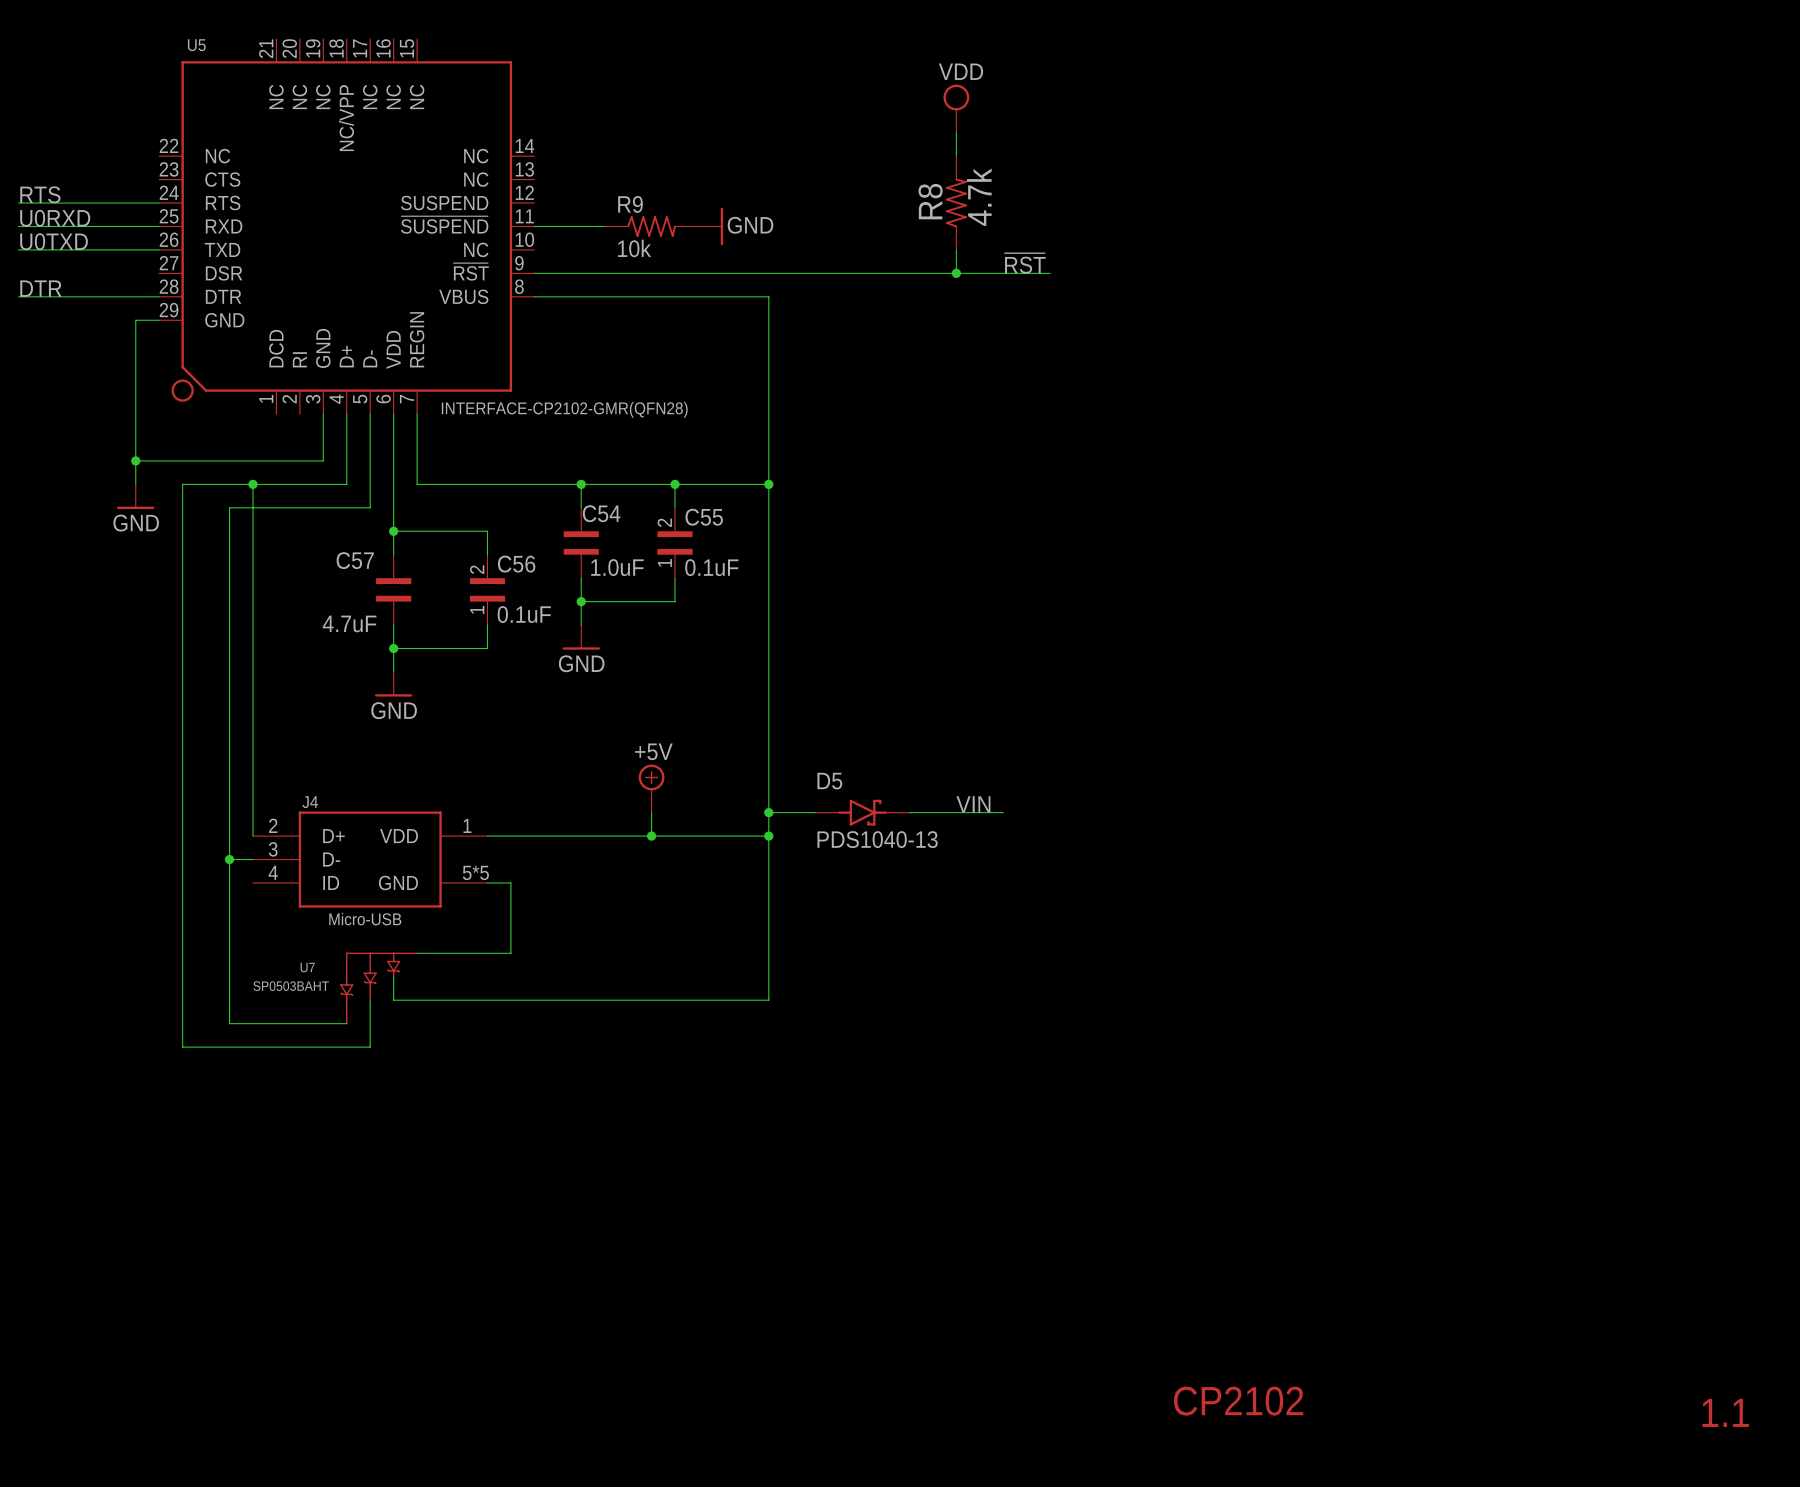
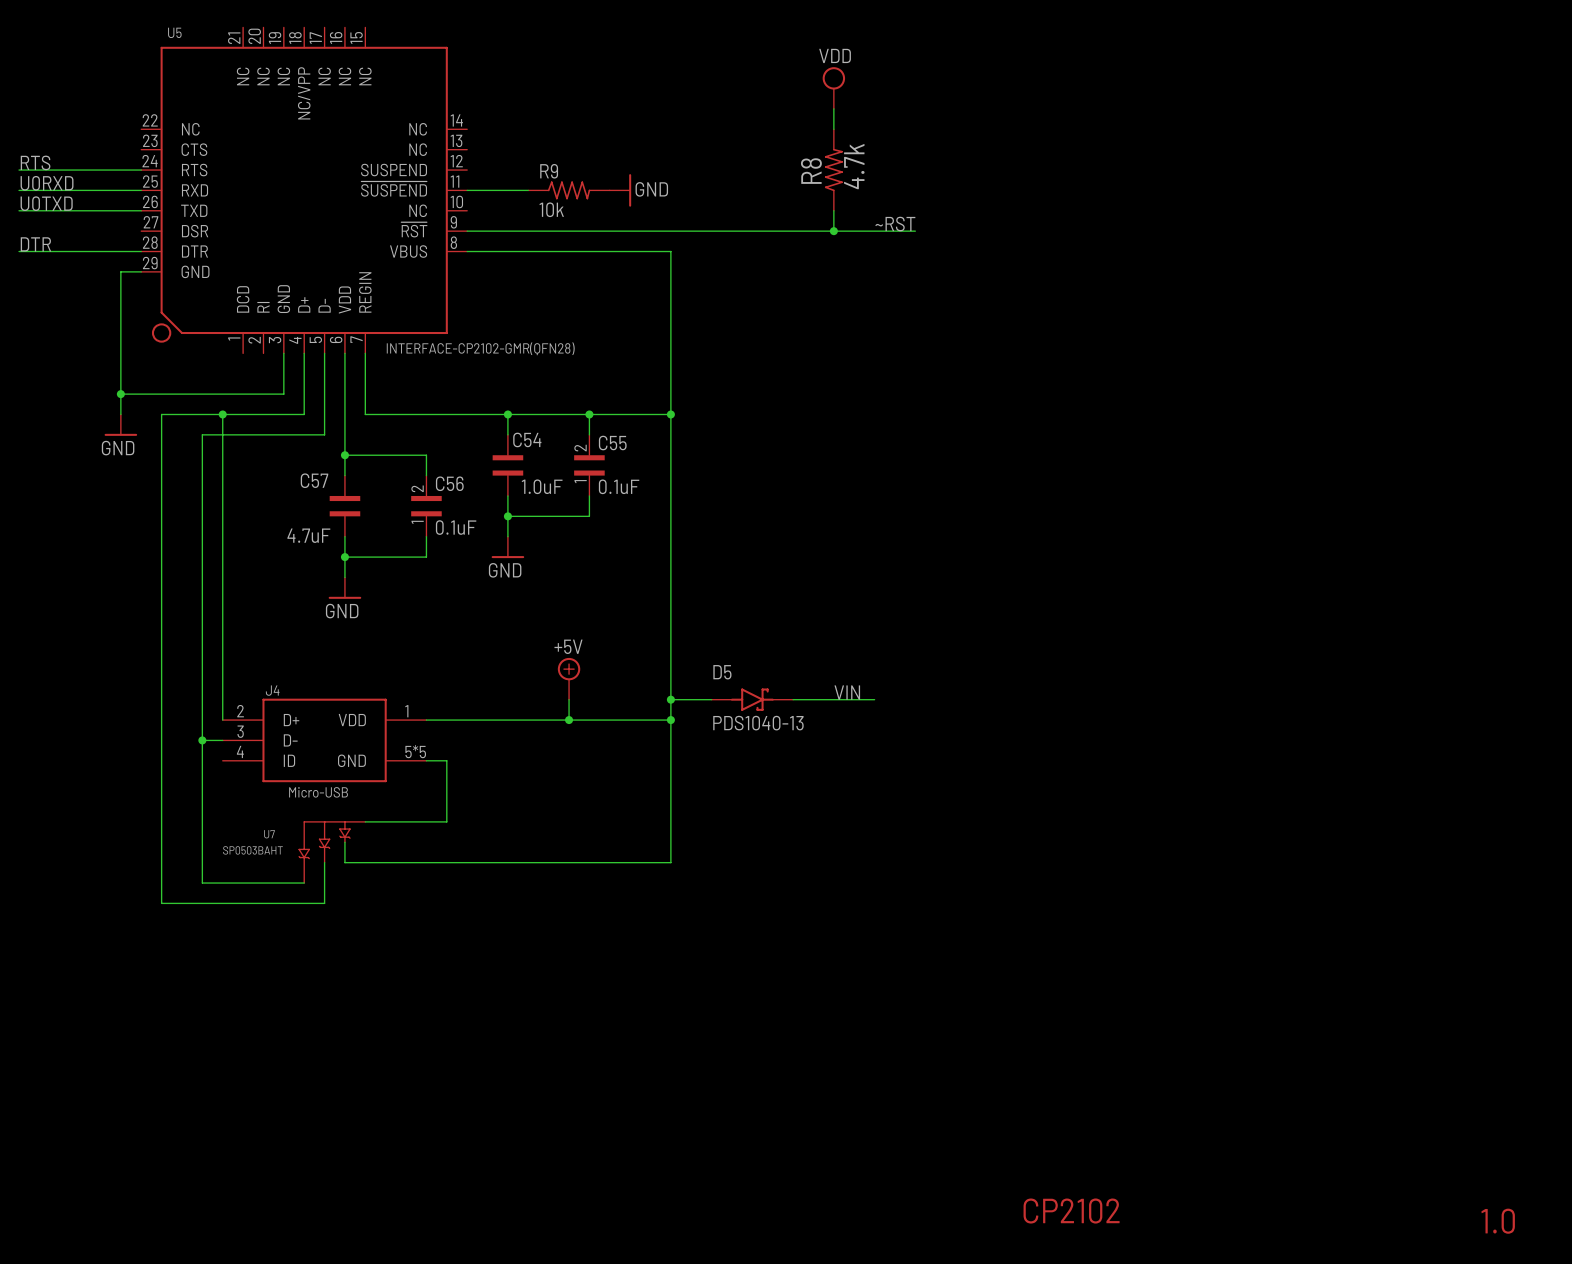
label: ~{RST} (1025, 263) -> ~RST (895, 224)
text: 1.1 (1725, 1412) -> 1.0 (1498, 1221)

